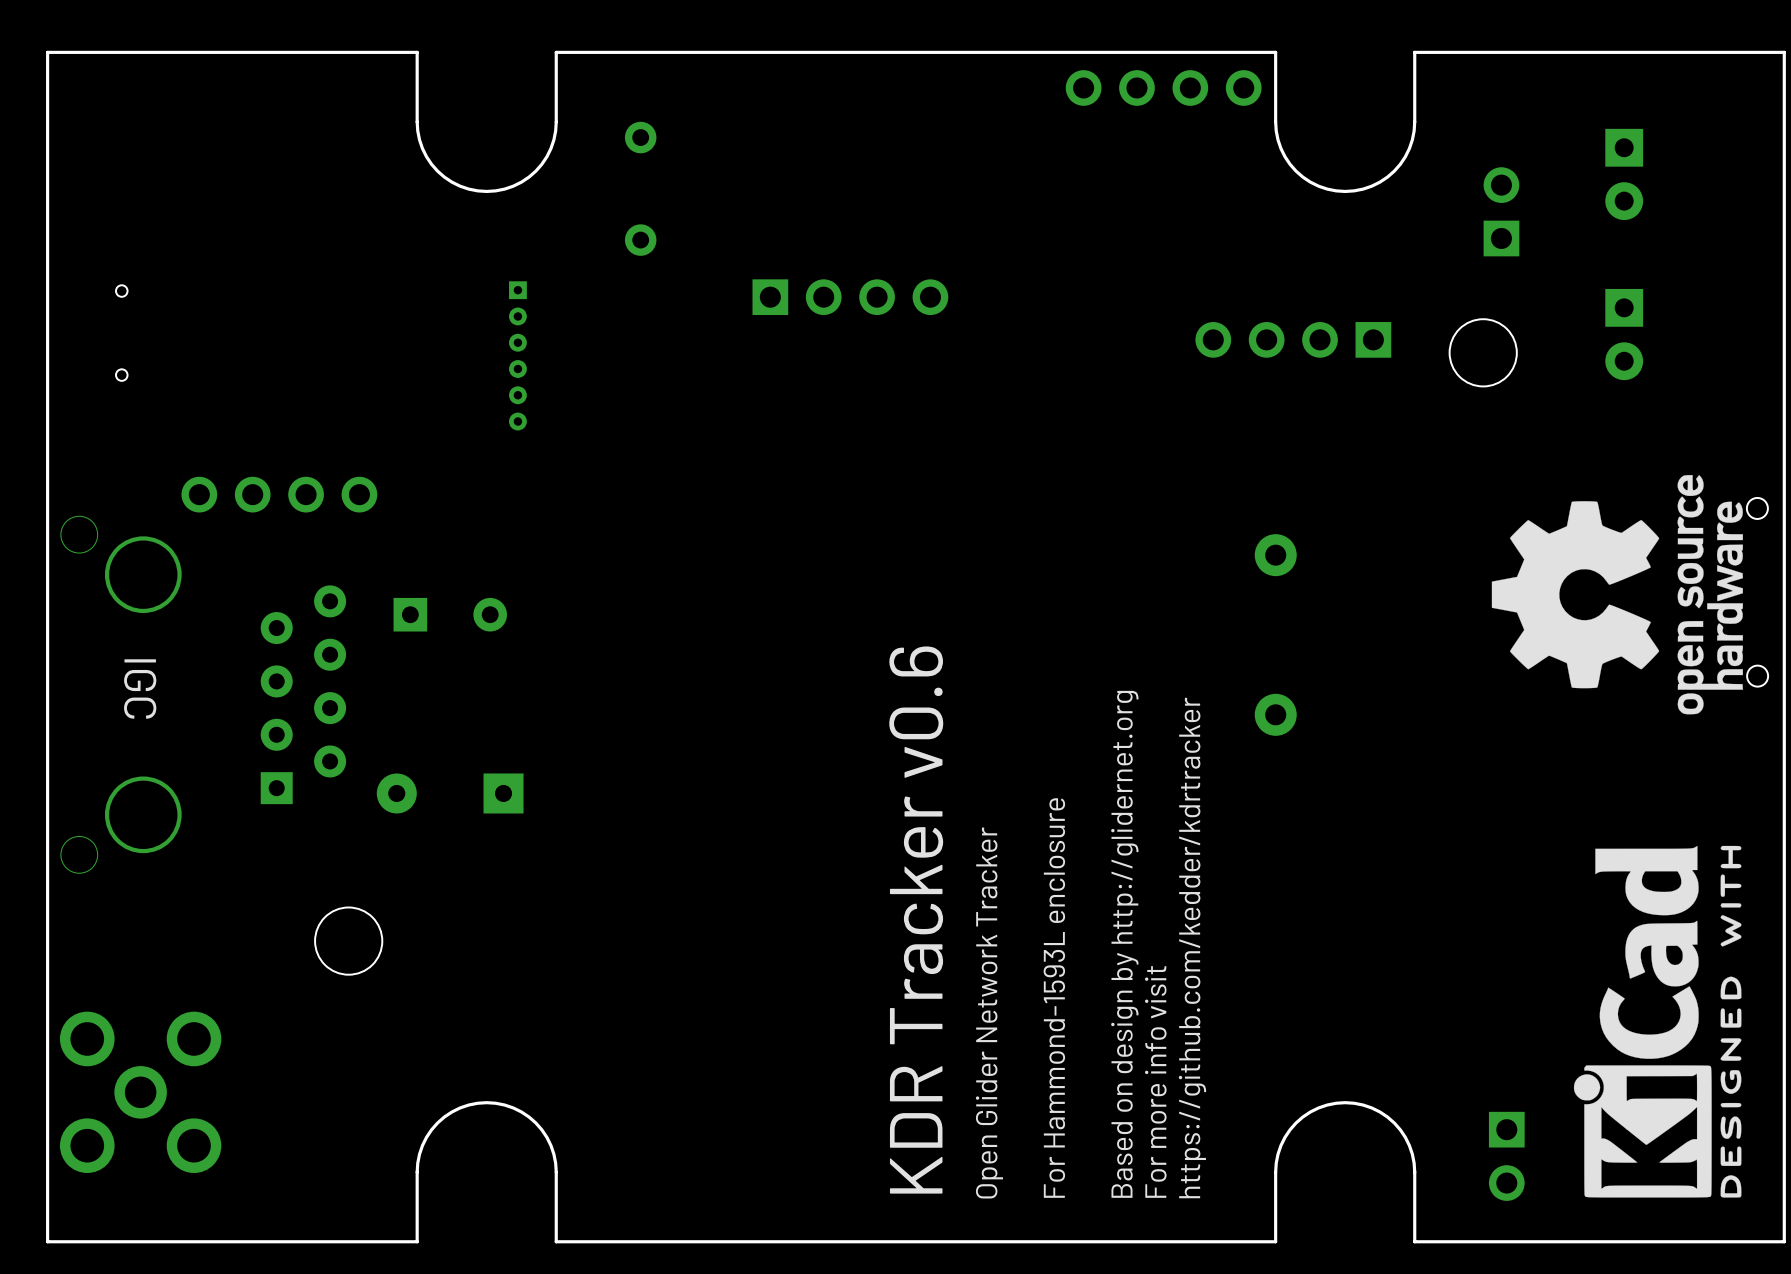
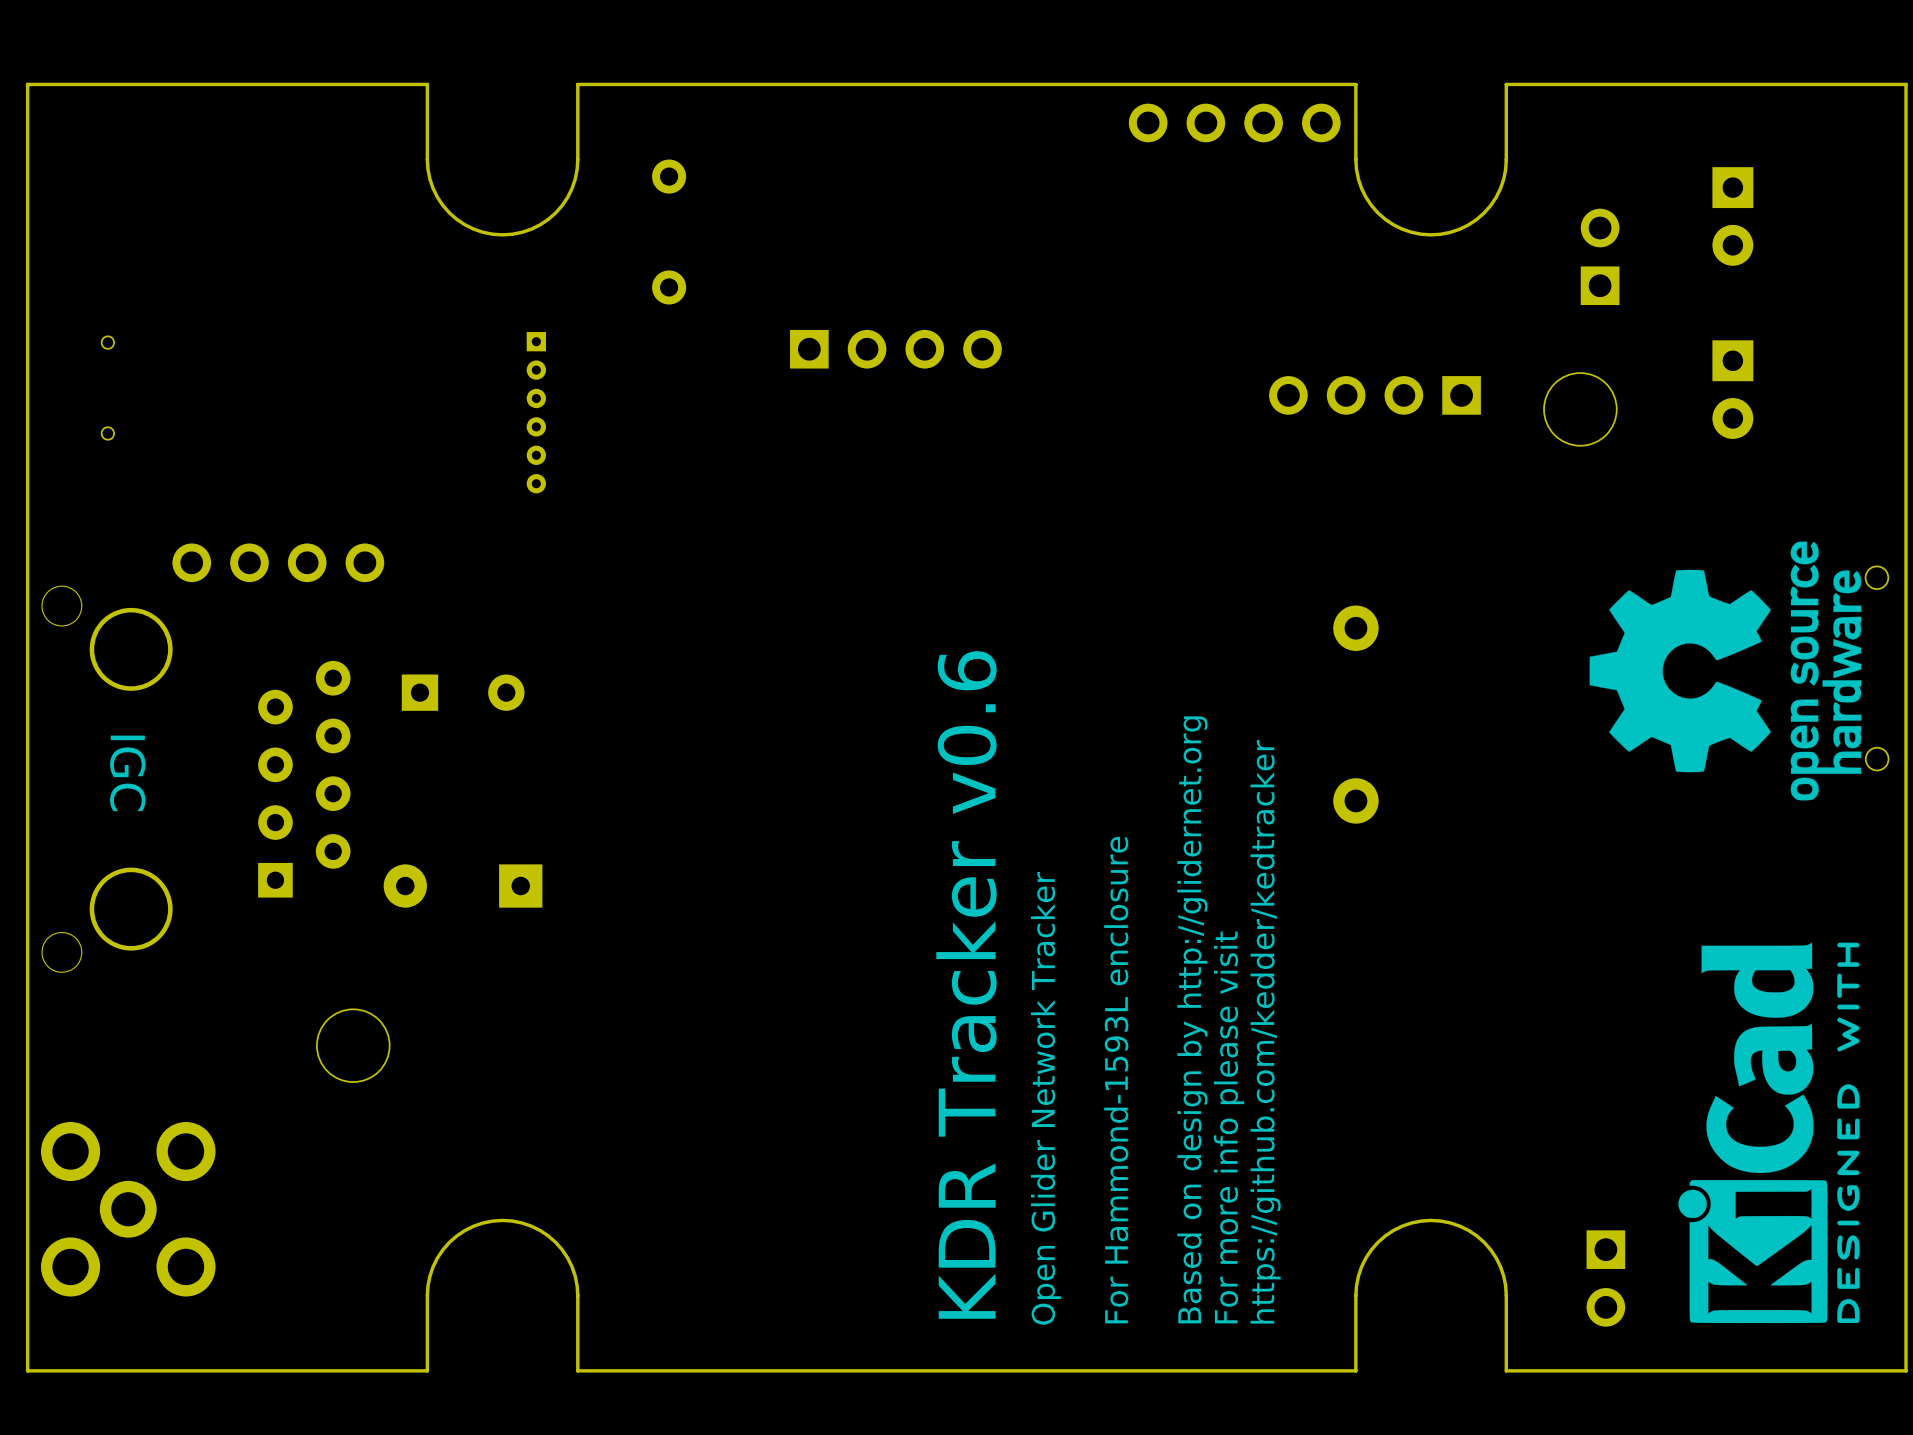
text: https://github.com/kedder/kdrtracker (1192, 947) -> https://github.com/kedder/kedtracker (1265, 1031)
text: For more info visit (1155, 1081) -> For more info please visit (1229, 1127)

